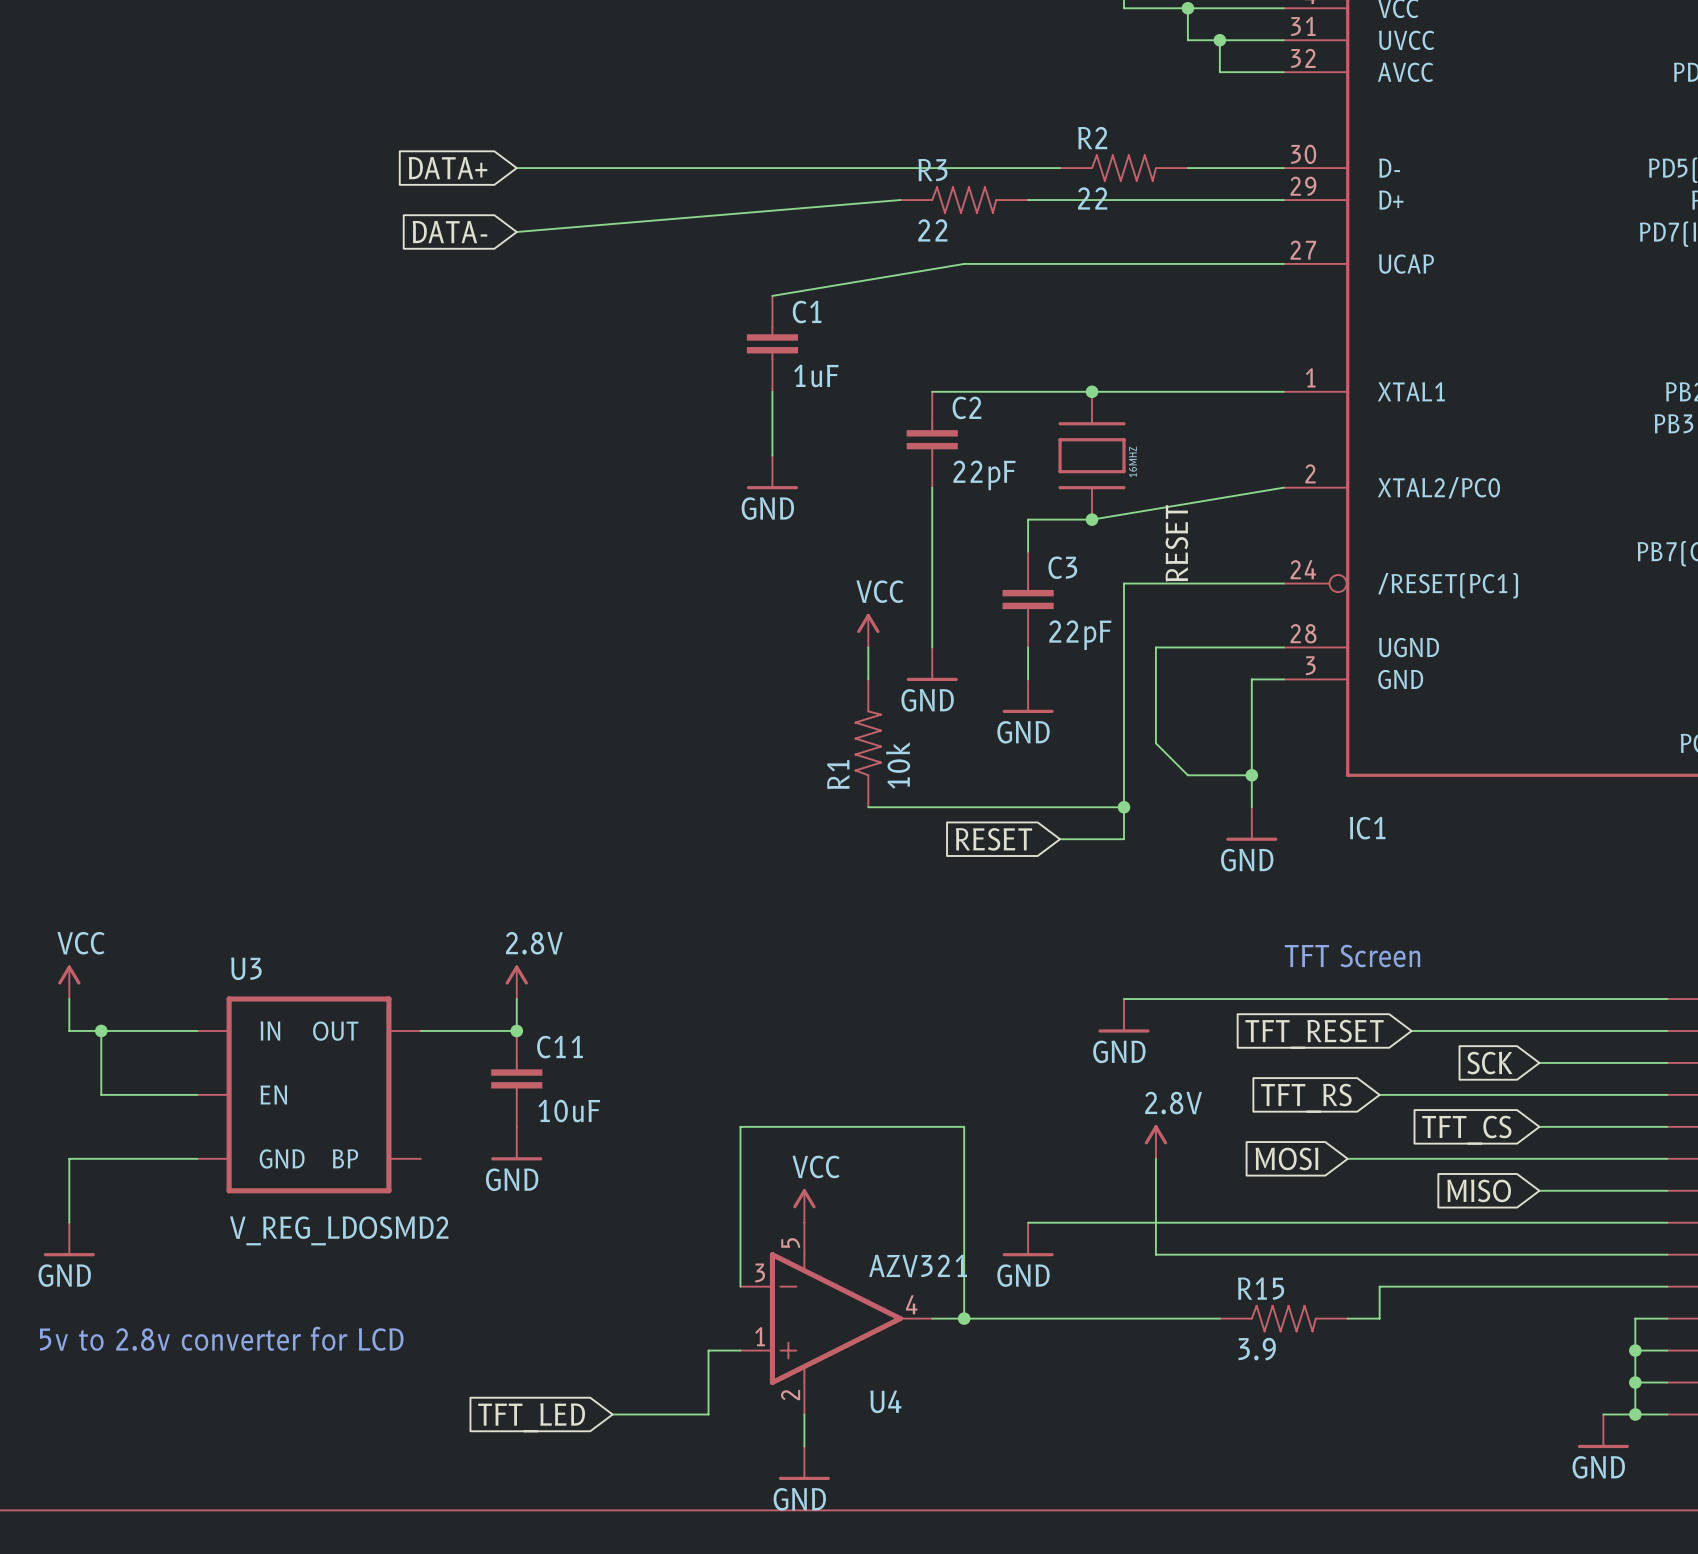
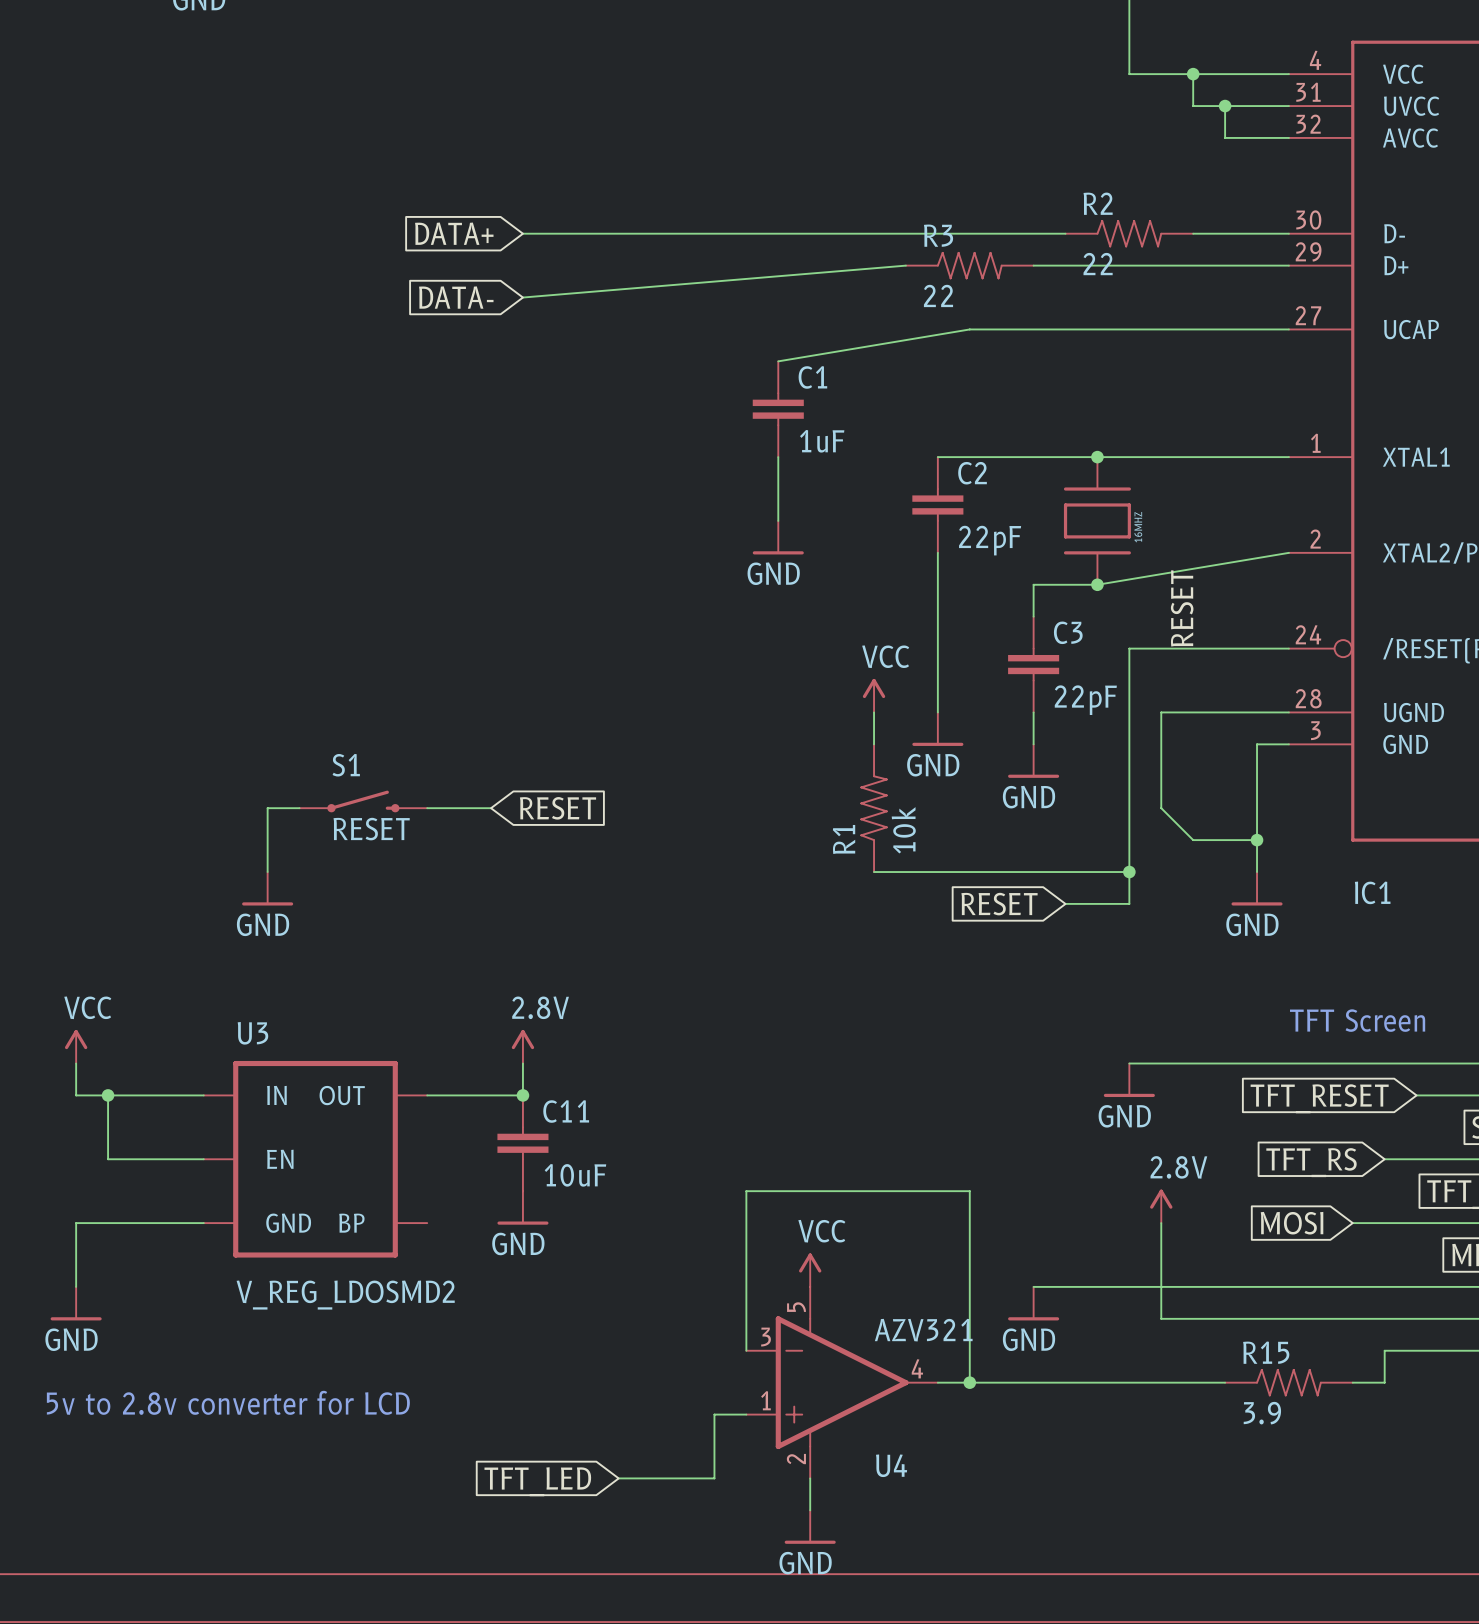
S1: none -> RESET (363, 801)
wire: none -> (299, 808) (267, 808) (267, 872)
wire: none -> (427, 808) (491, 808)
global label: none -> RESET (558, 808)
power symbol: none -> GND (267, 888)

